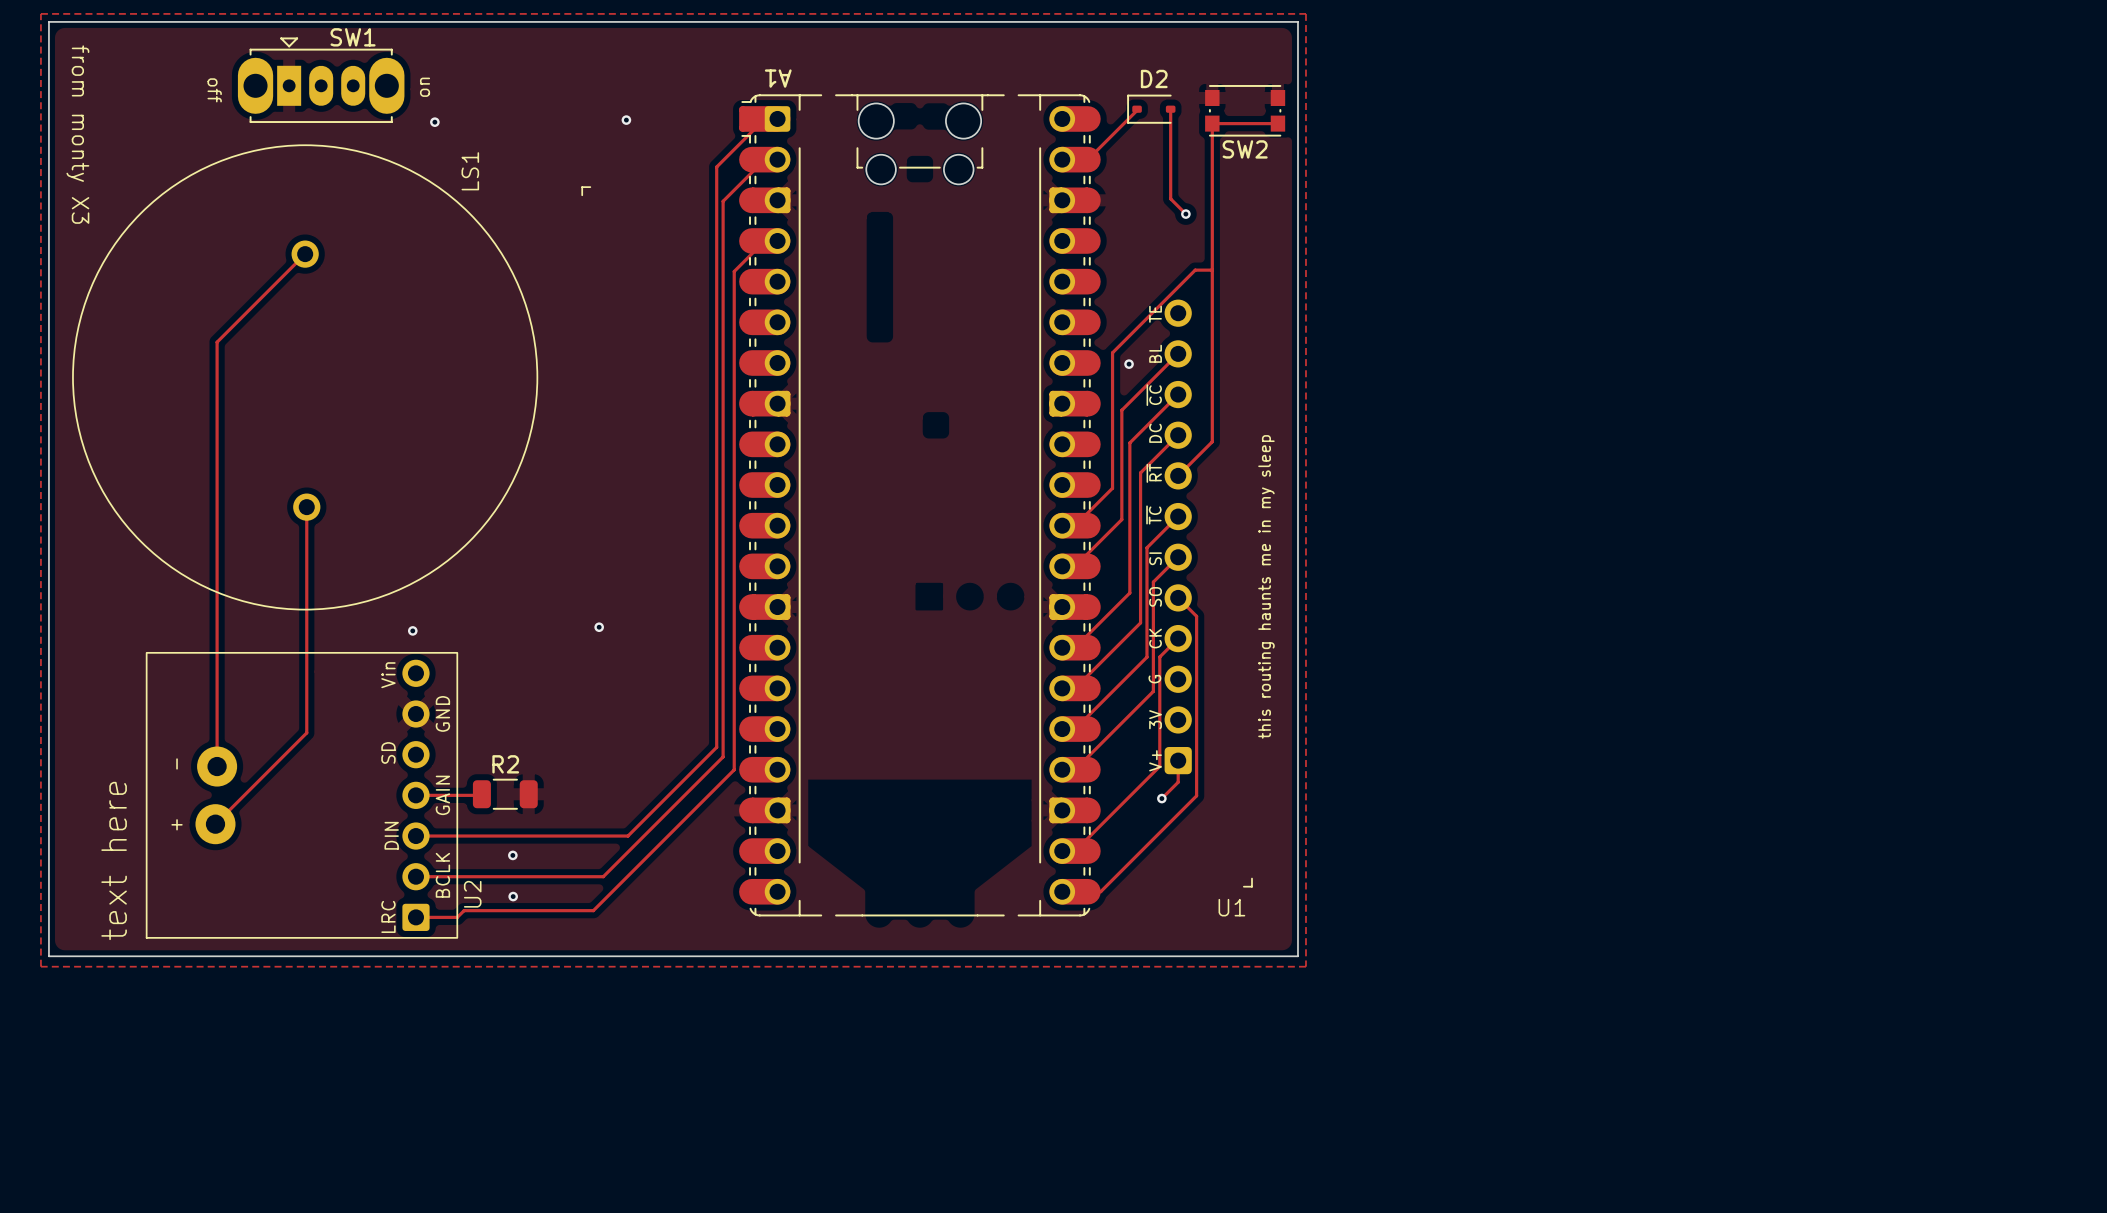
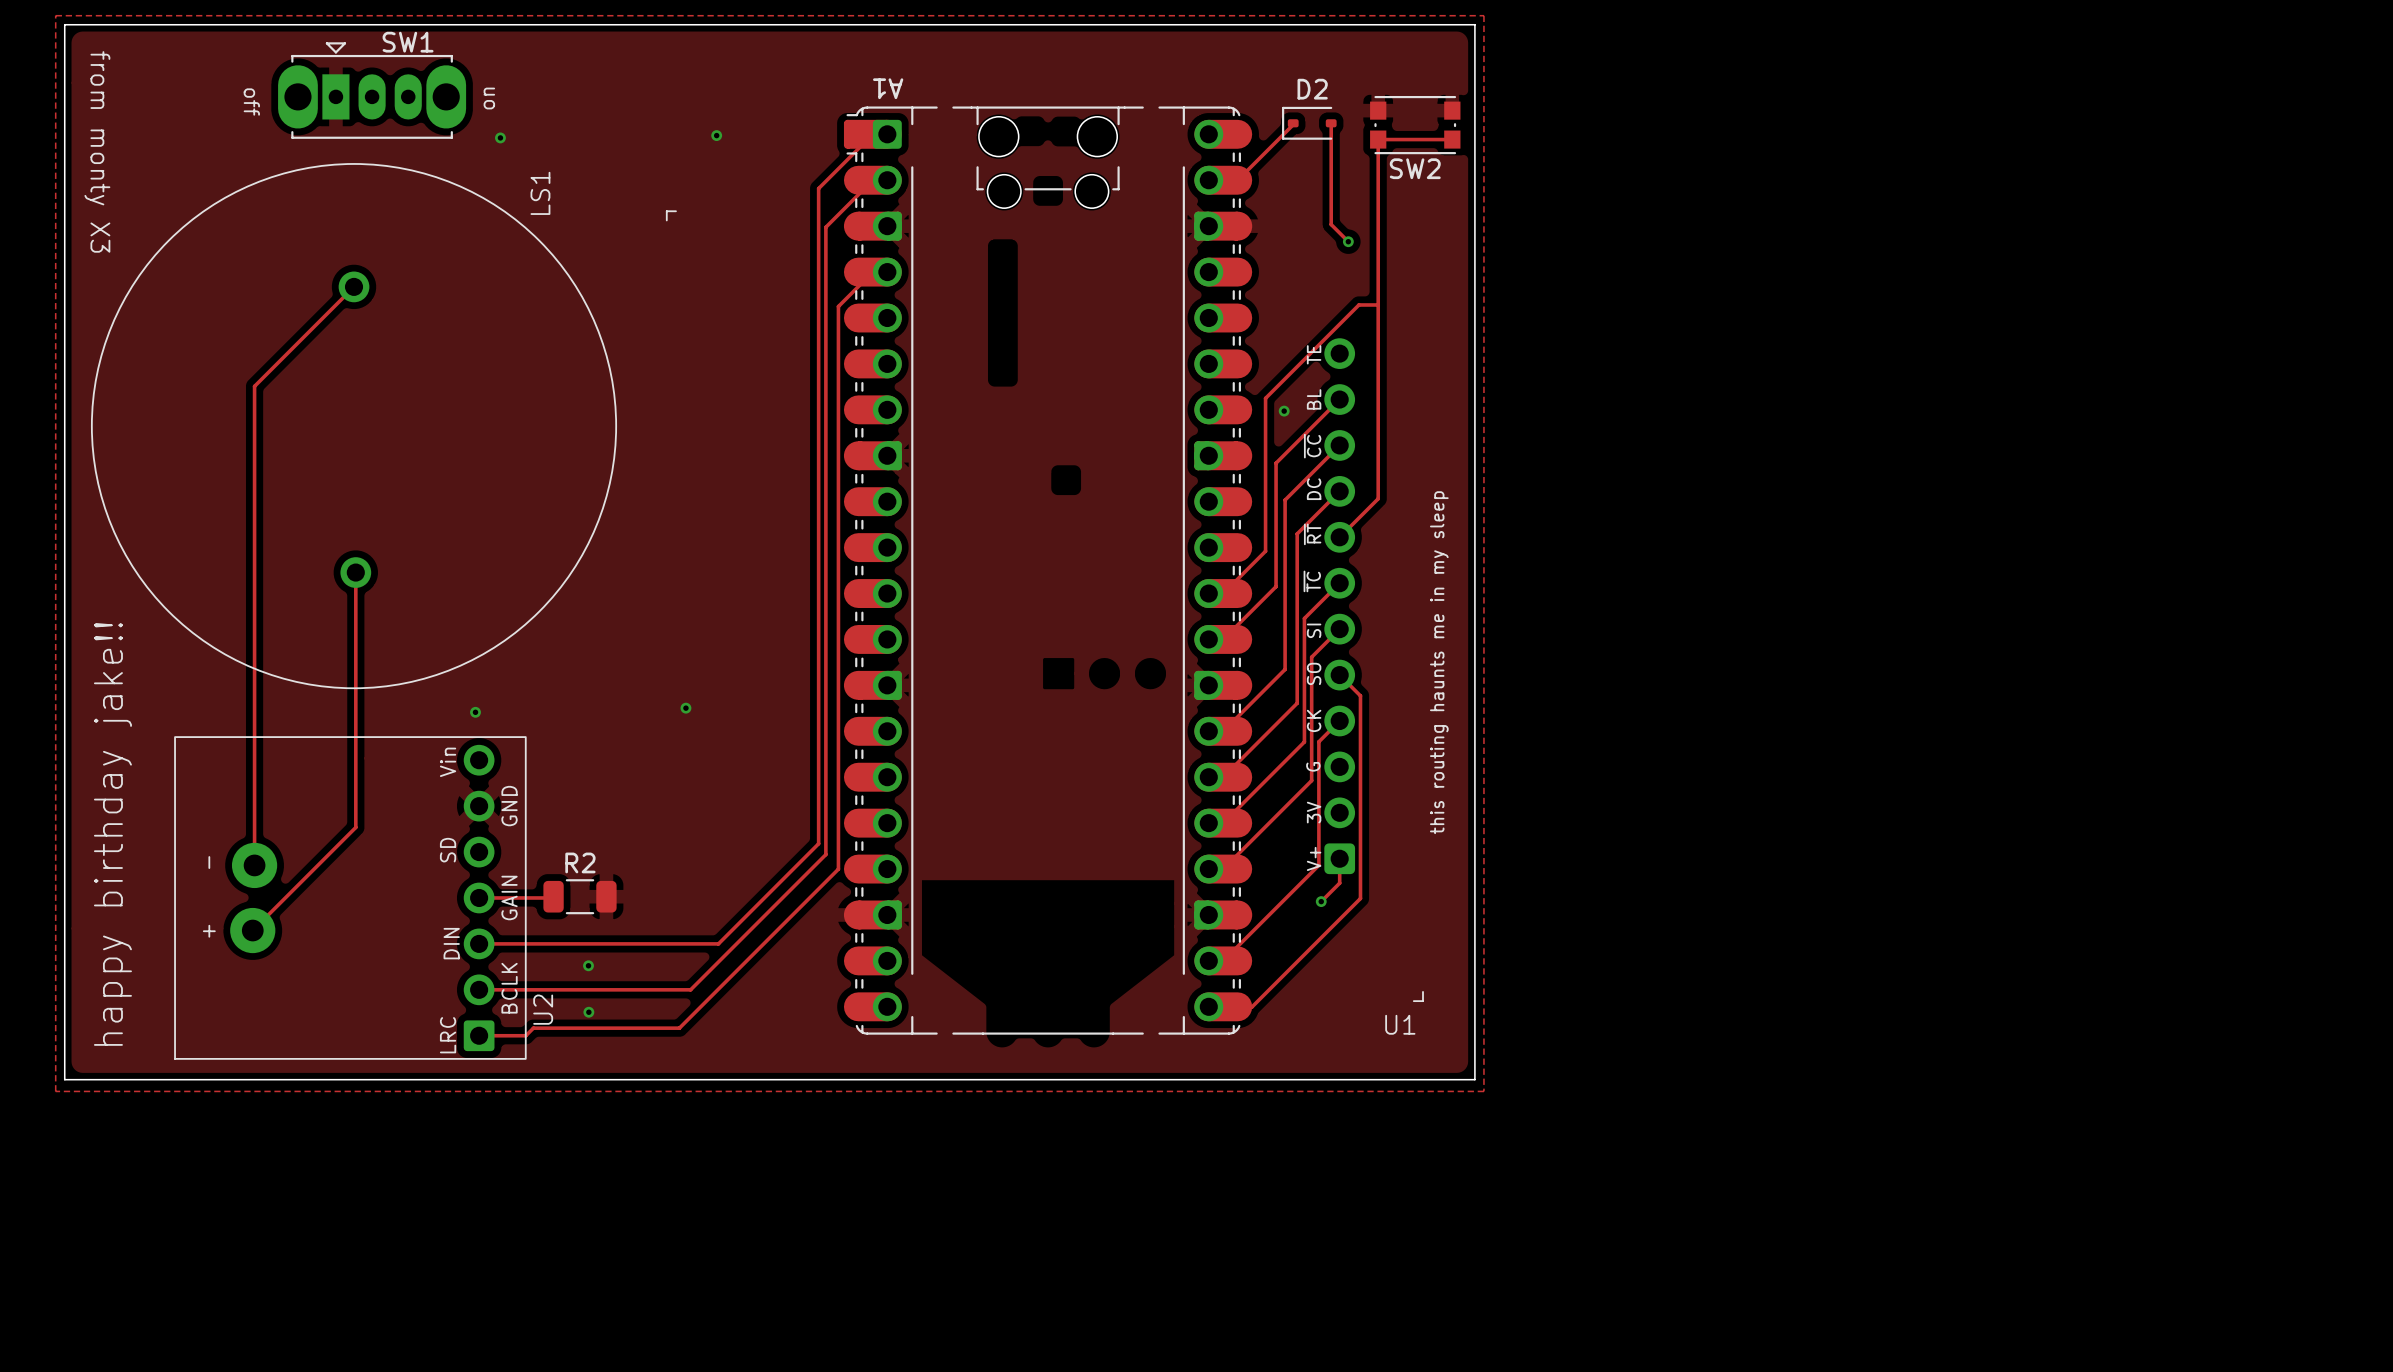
text: none -> happy birthday jake!! (112, 834)
text: text here (114, 860) -> none

